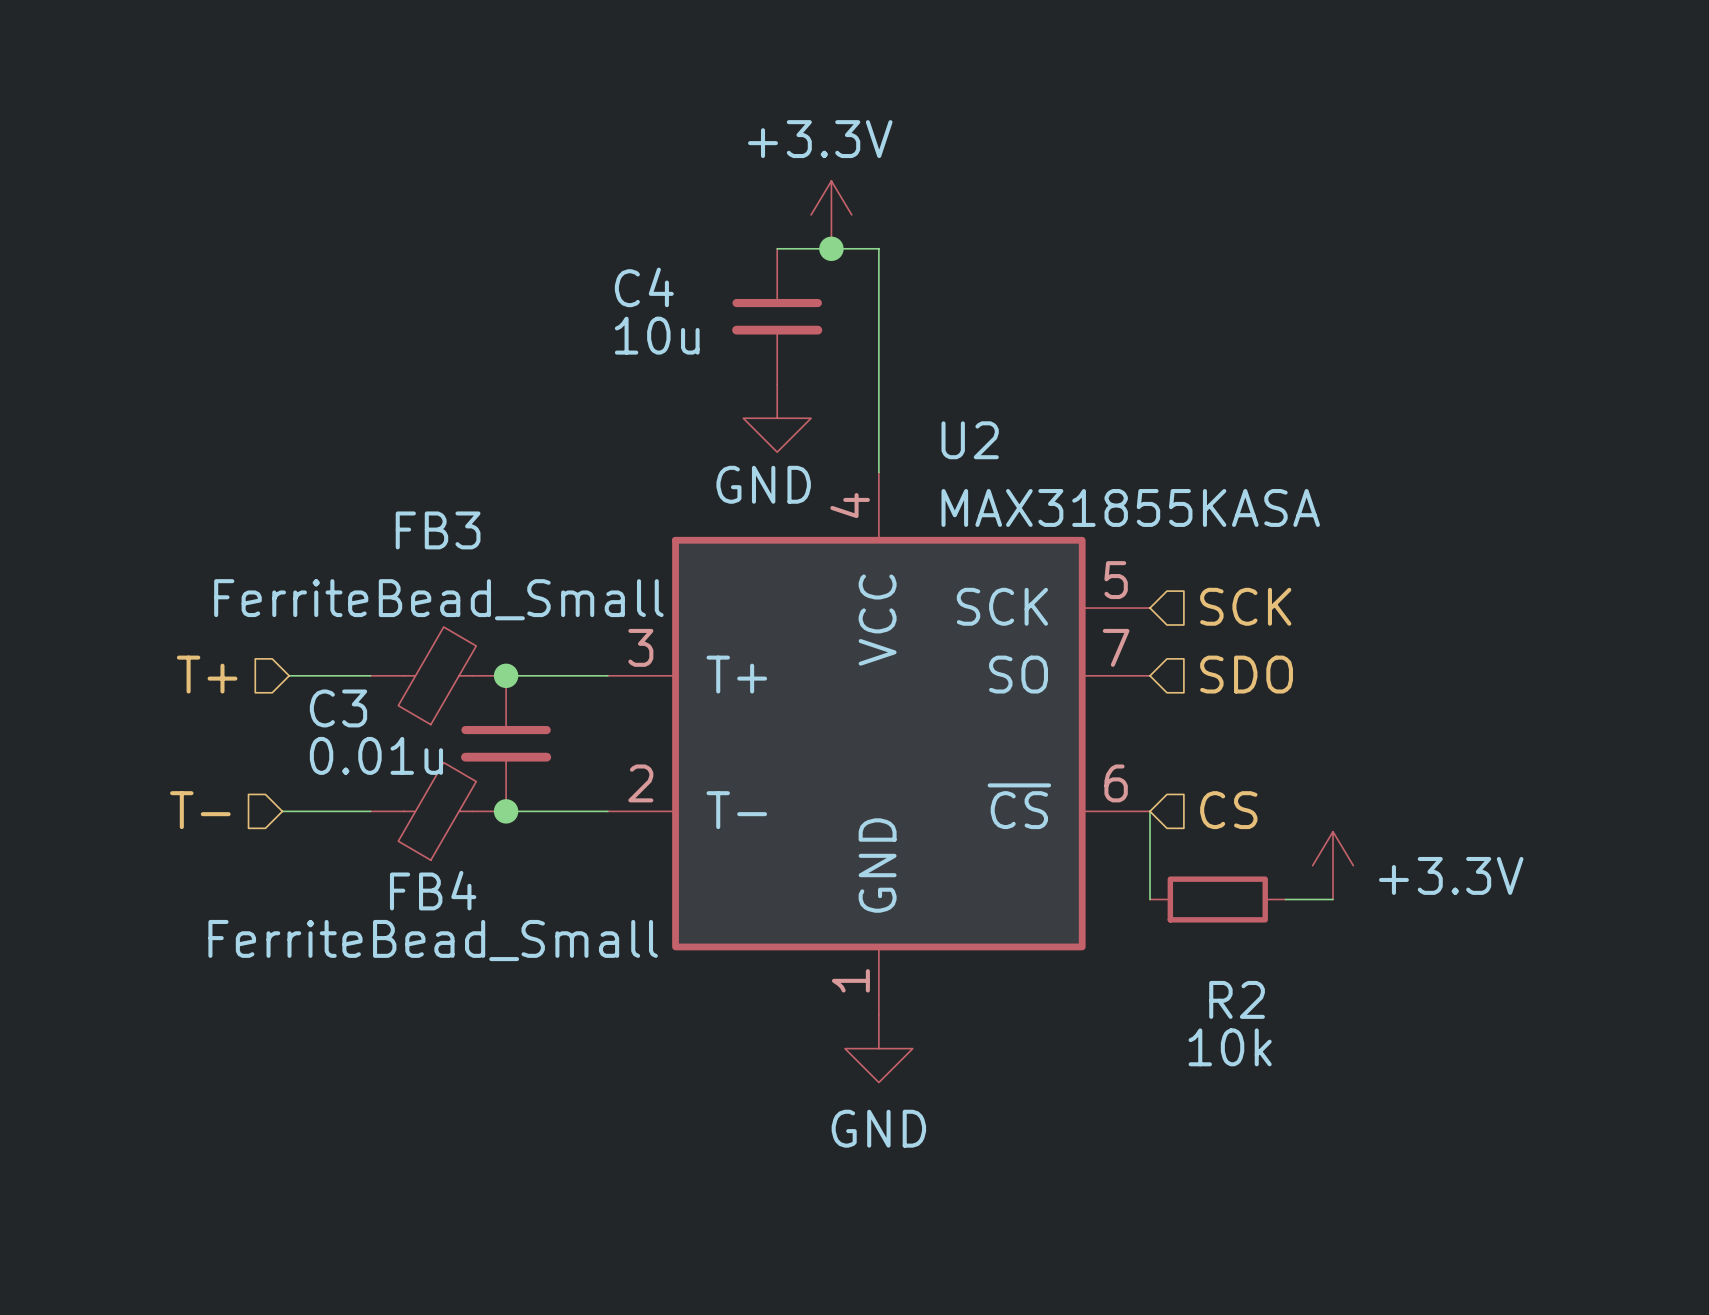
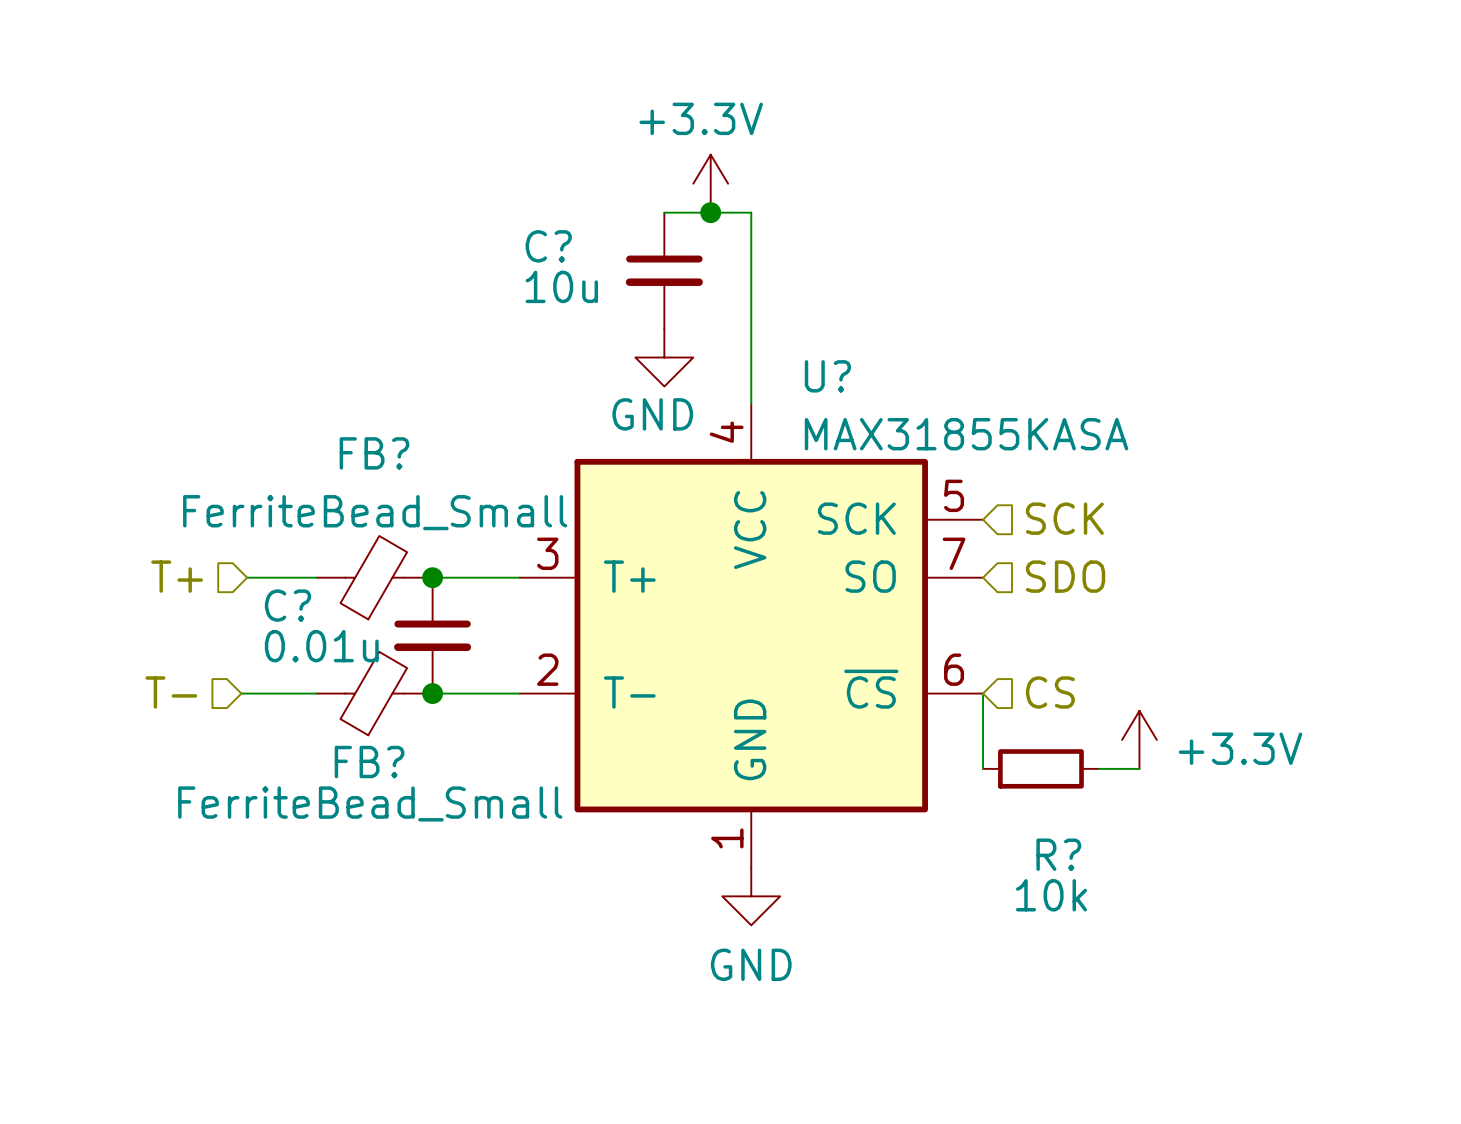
C4 name: C4 (644, 287) -> C? (548, 246)
U2 name: U2 (970, 440) -> U? (827, 376)
FB3 name: FB3 (438, 530) -> FB? (374, 453)
C3 name: C3 (338, 708) -> C? (287, 605)
FB4 name: FB4 (433, 890) -> FB? (369, 762)
R2 name: R2 (1237, 999) -> R? (1058, 854)

